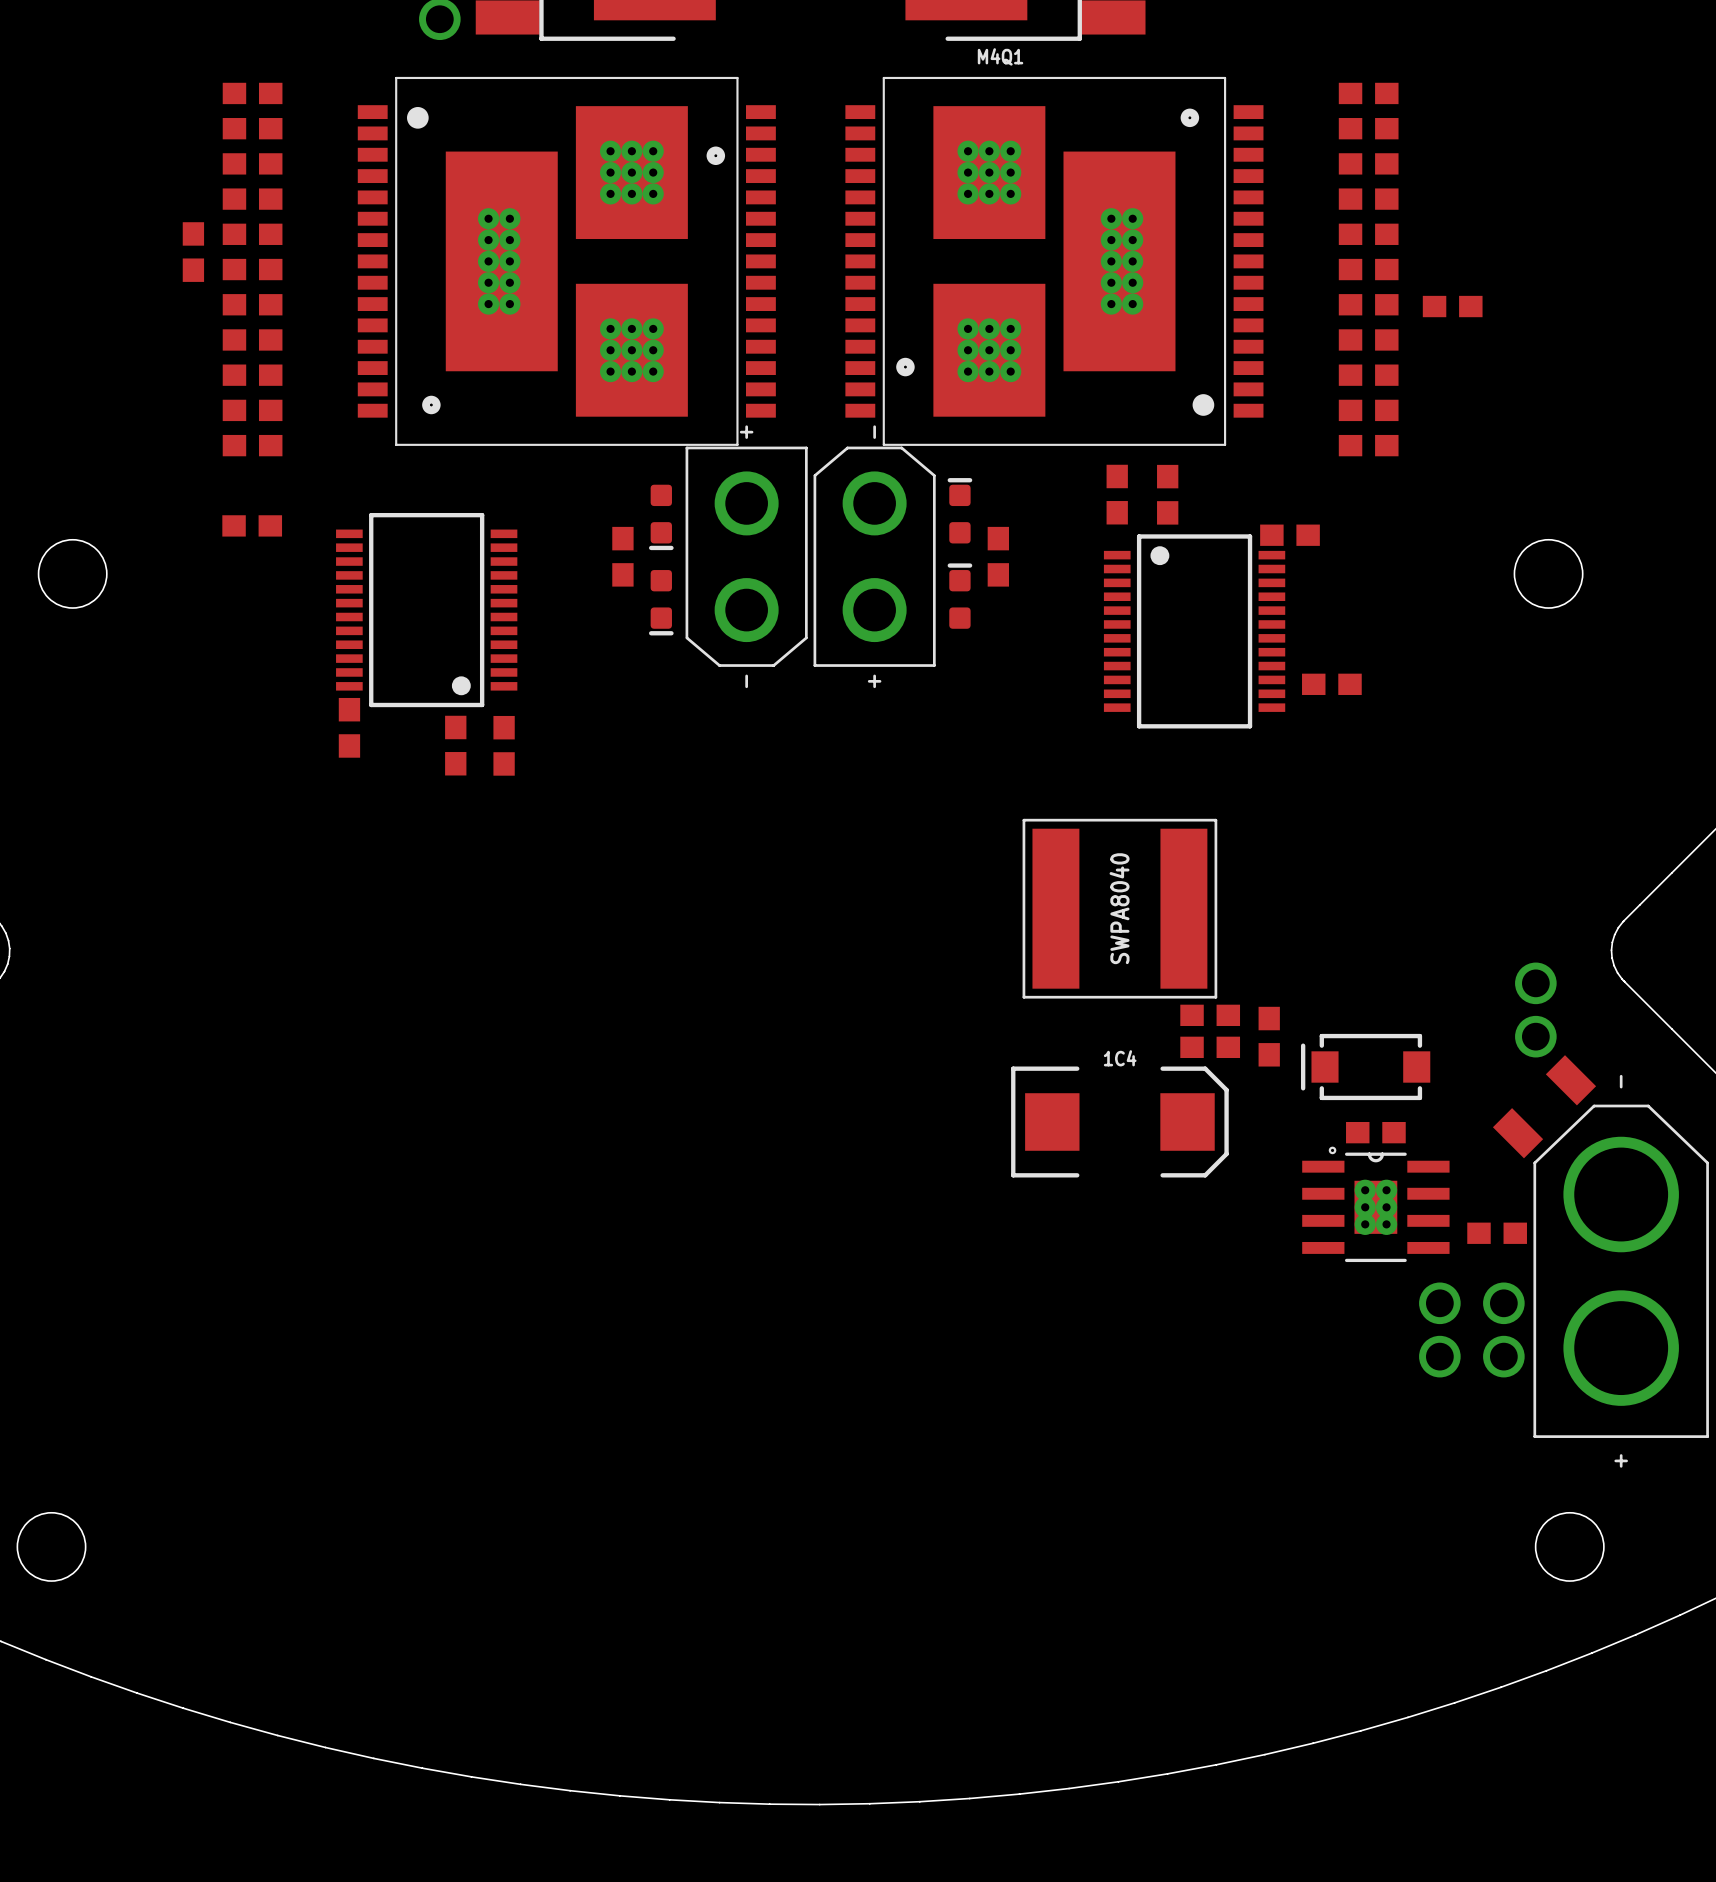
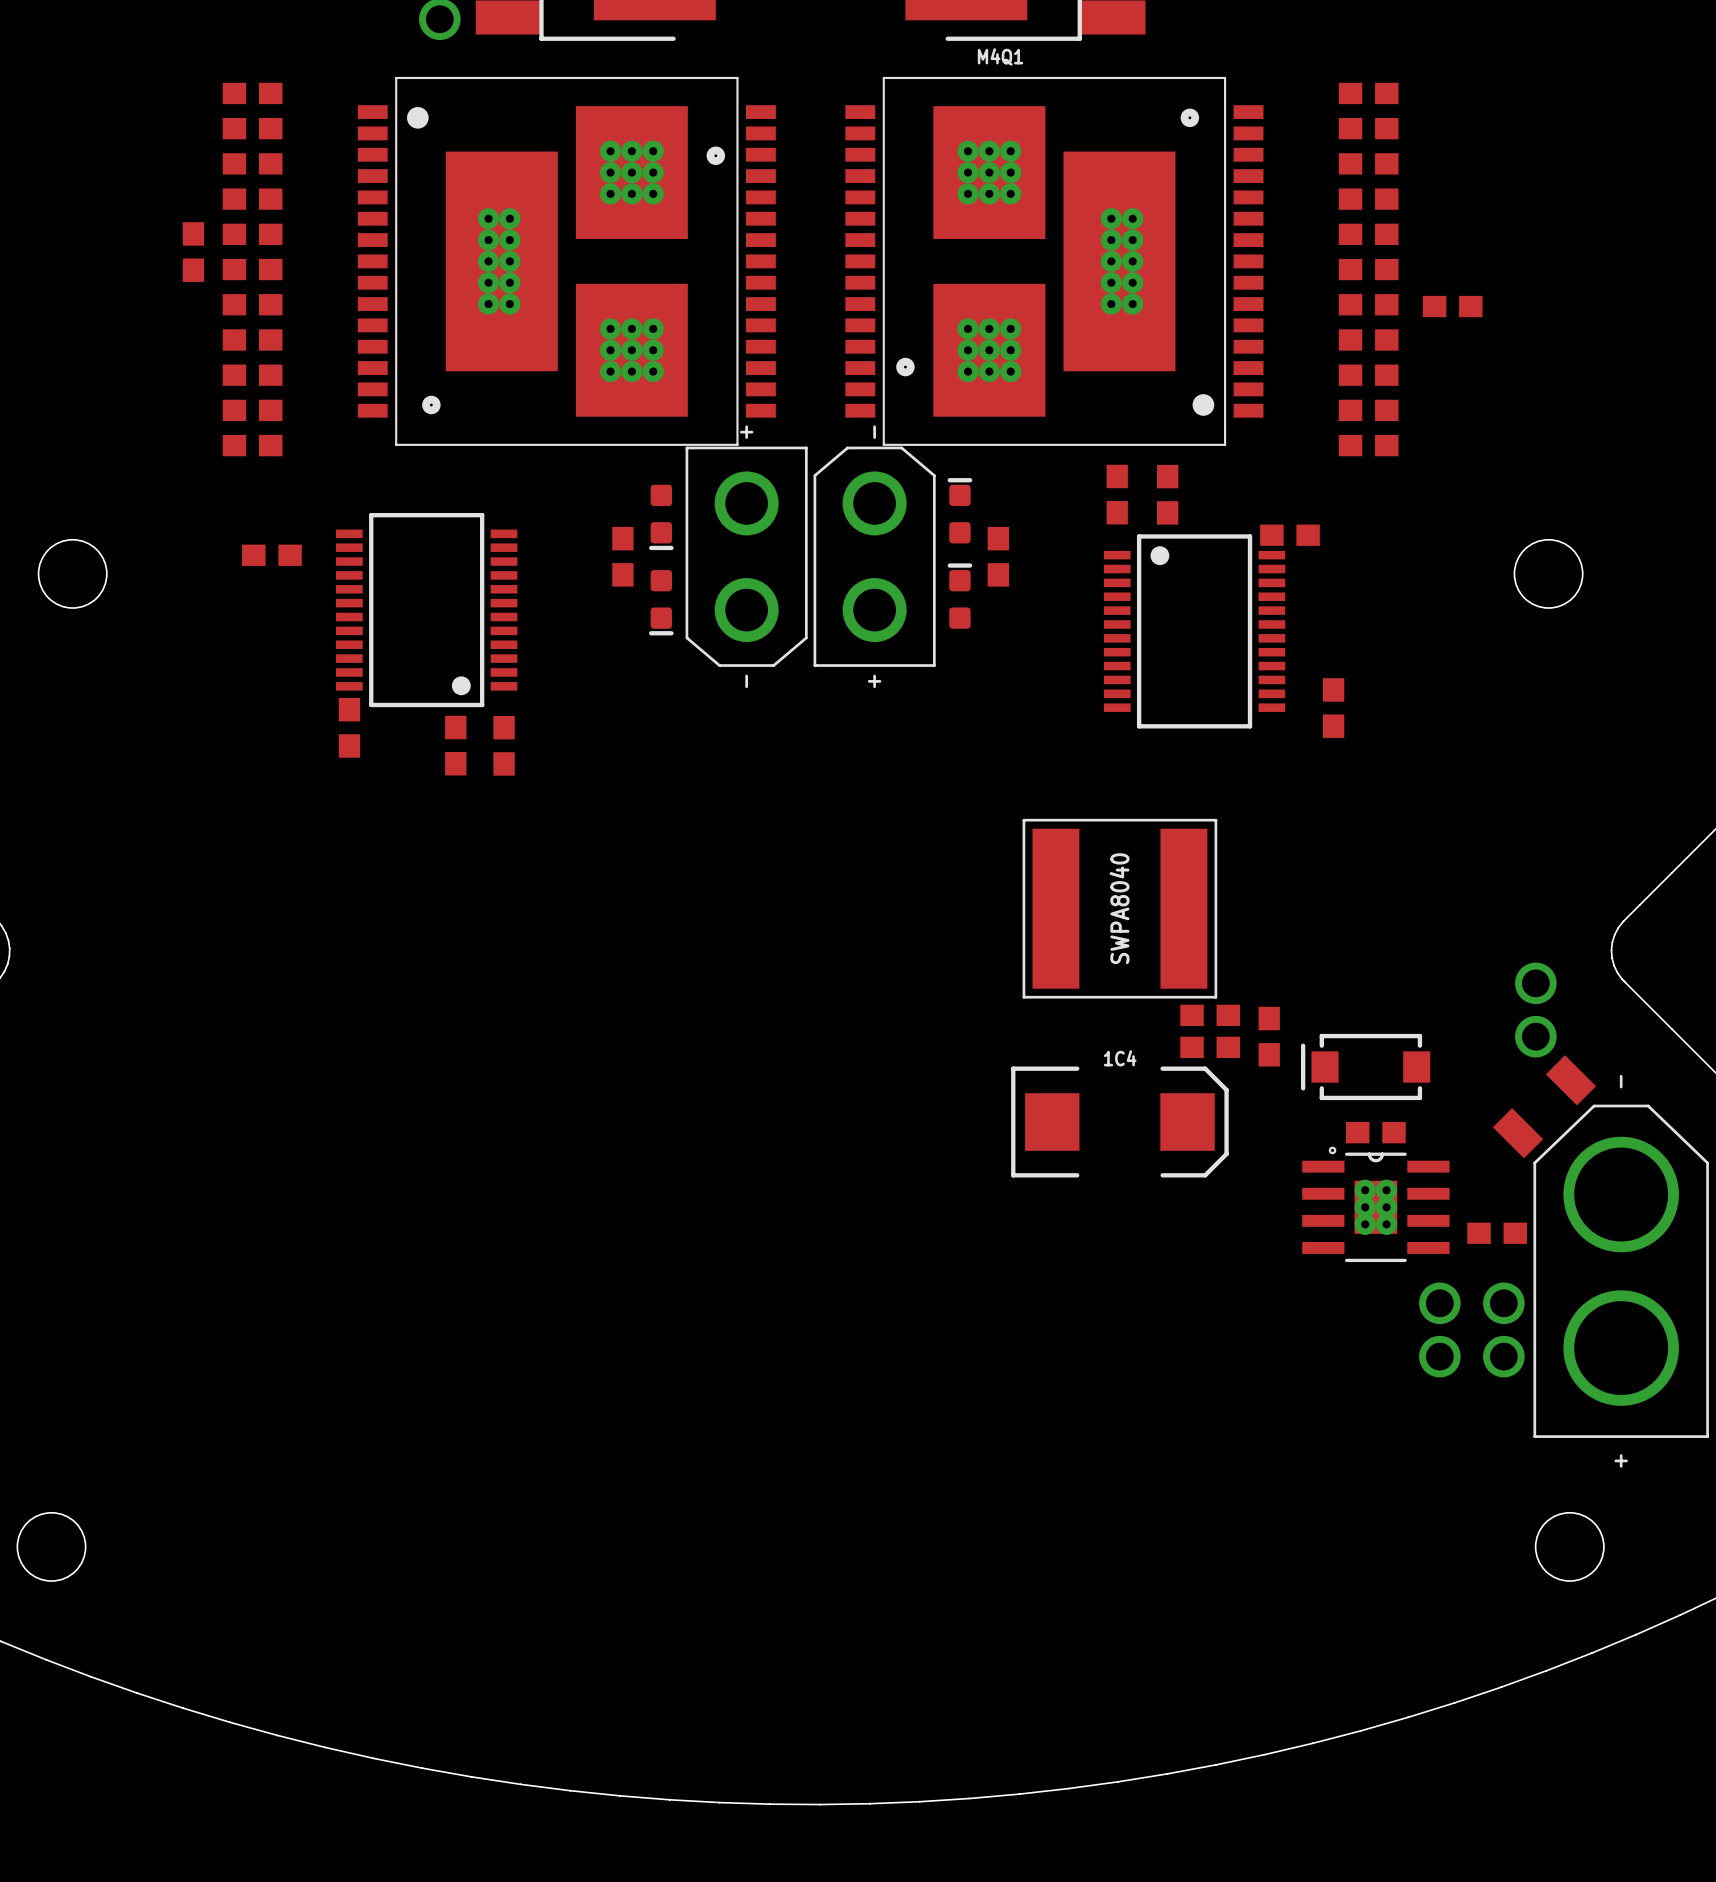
part position: (252, 525) -> (271, 555)
part rotation: 0° (1331, 684) -> 90° clockwise (1333, 708)

